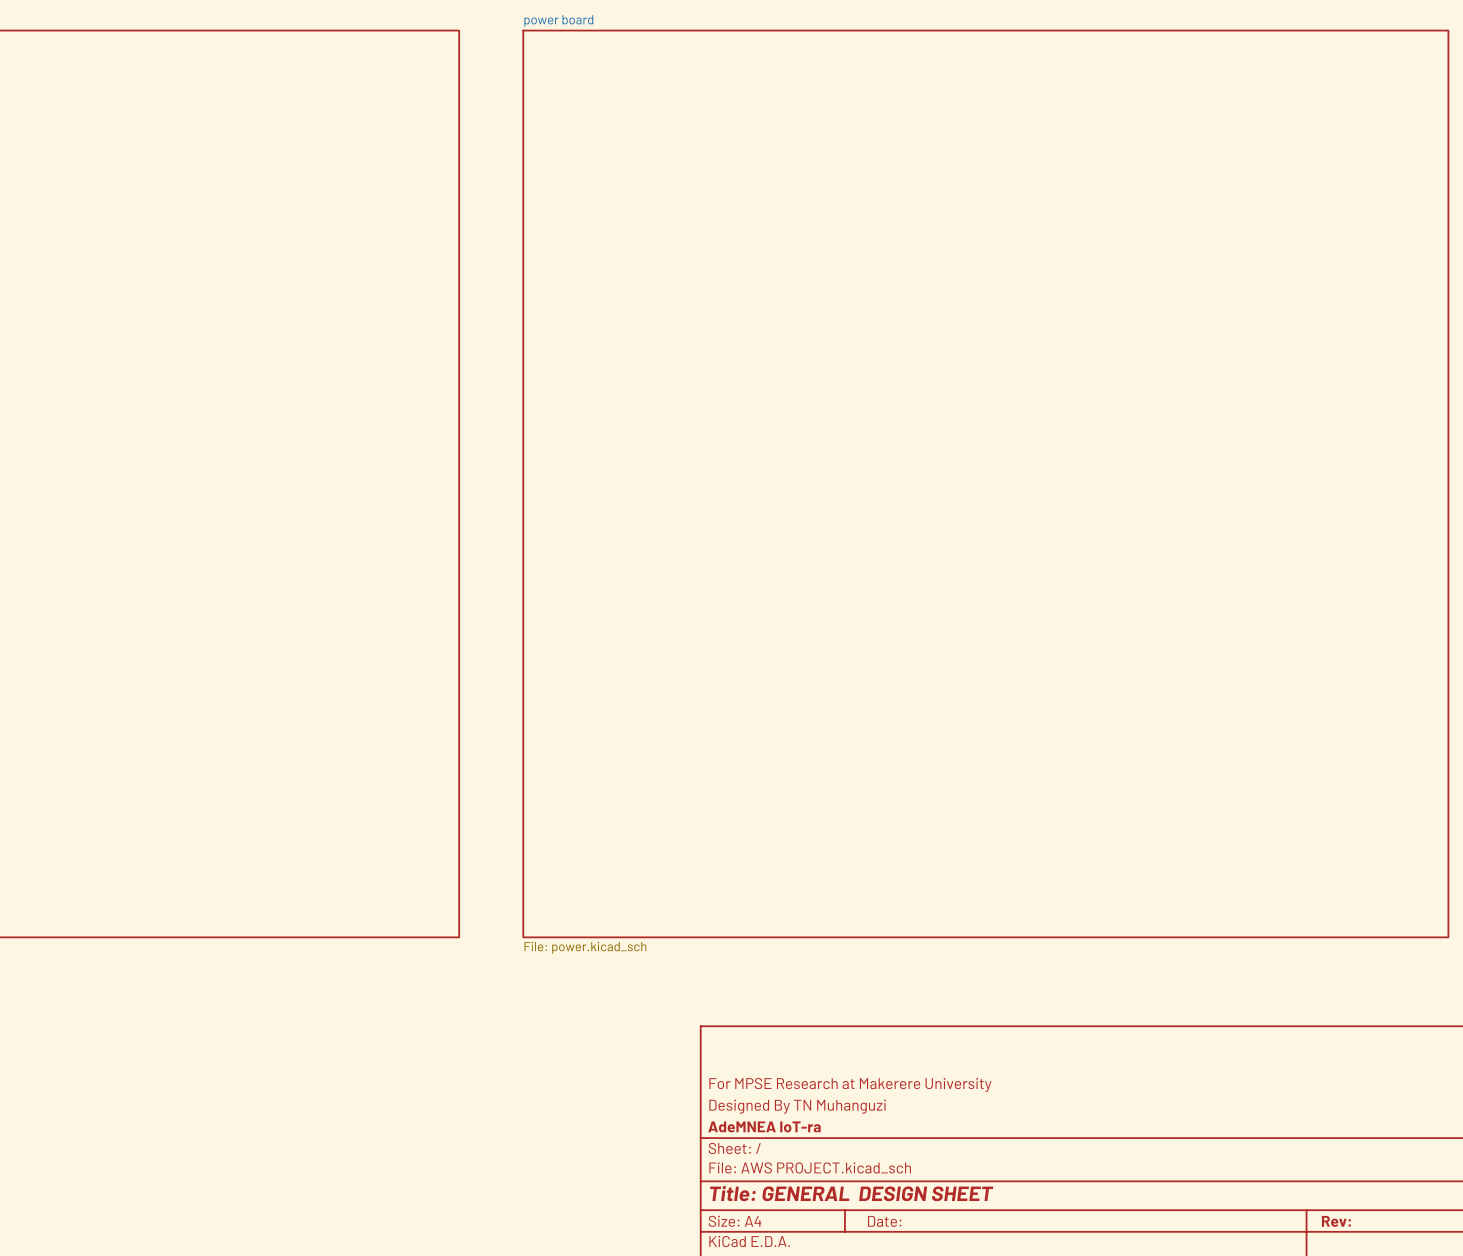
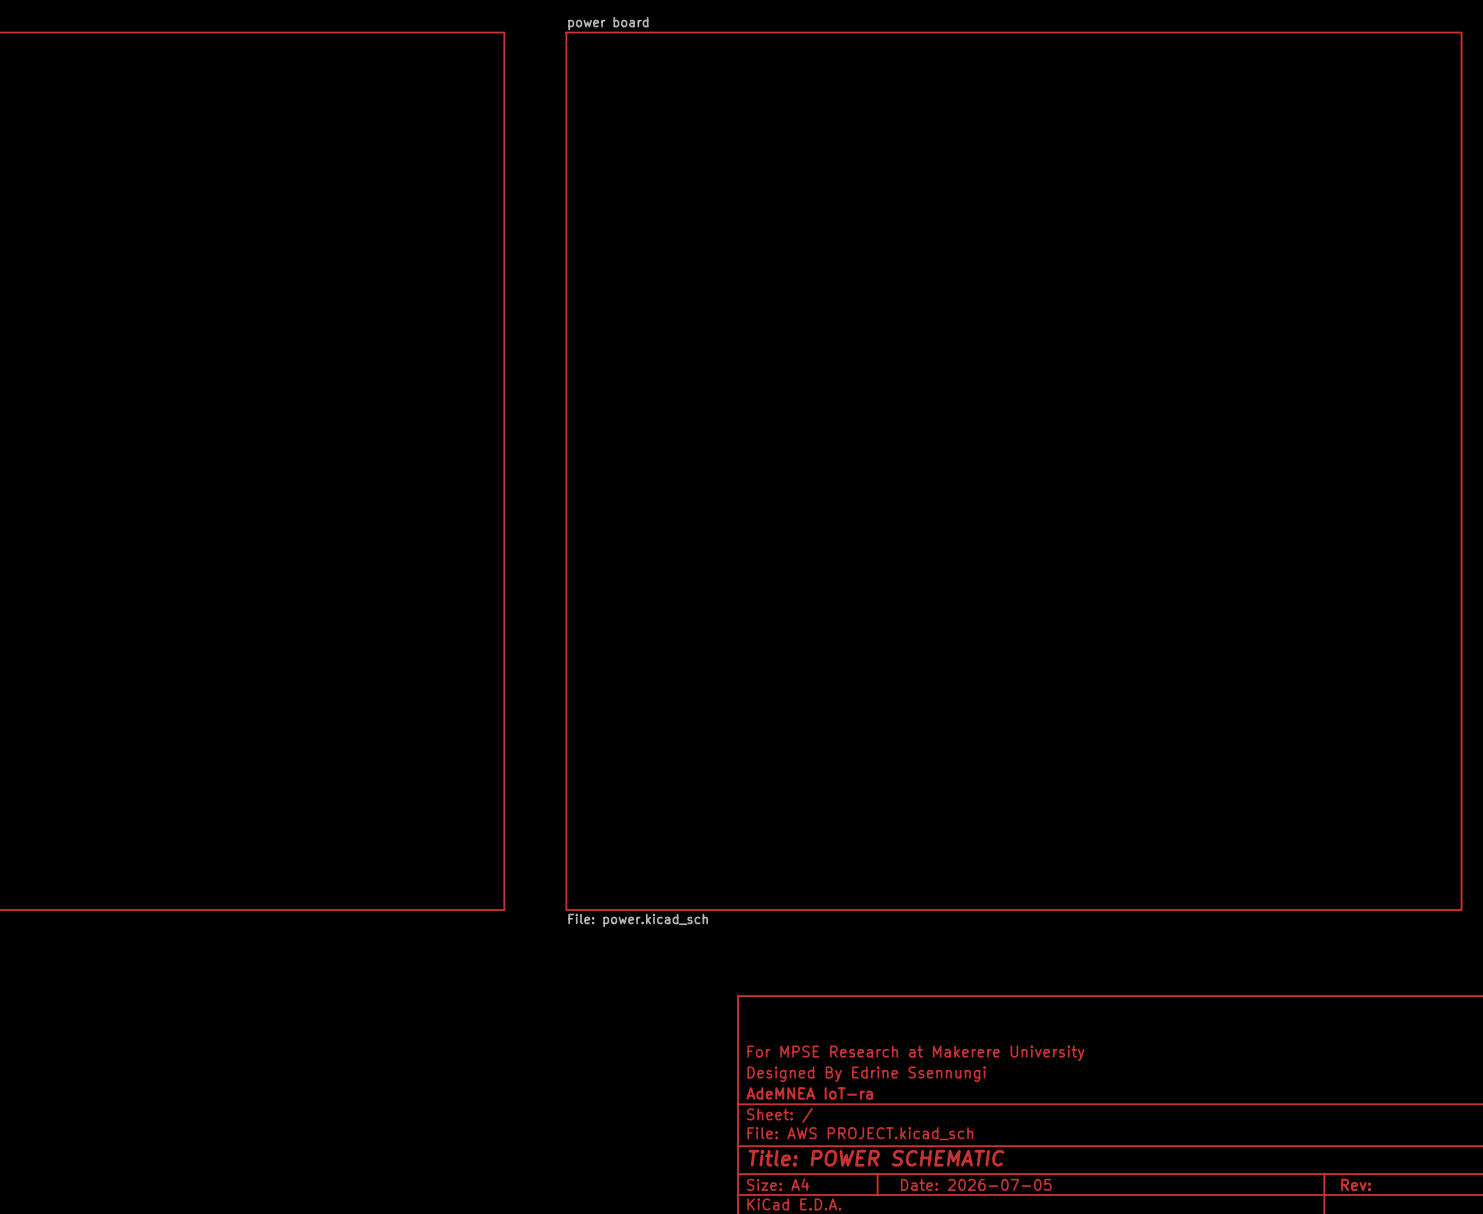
title block: Designed By TN Muhanguzi (797, 1106) -> Designed By Edrine Ssennungi (866, 1074)
title block: Title: GENERAL DESIGN SHEET (851, 1193) -> Title: POWER SCHEMATIC (876, 1158)
title block: Date: (884, 1221) -> Date: 2026-07-05 (976, 1184)

